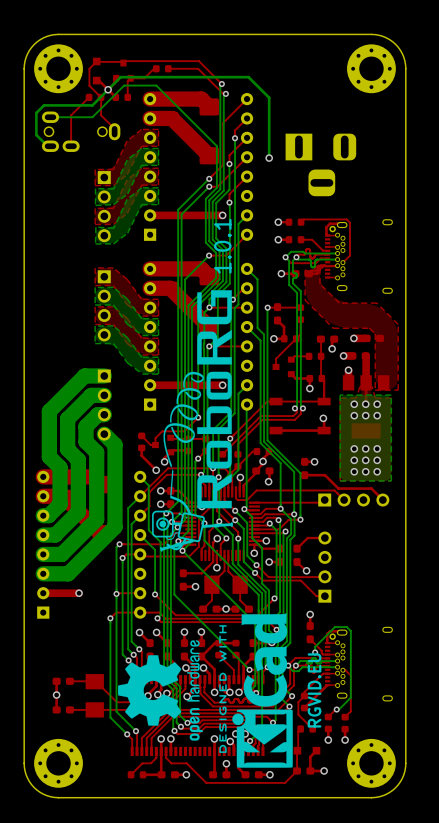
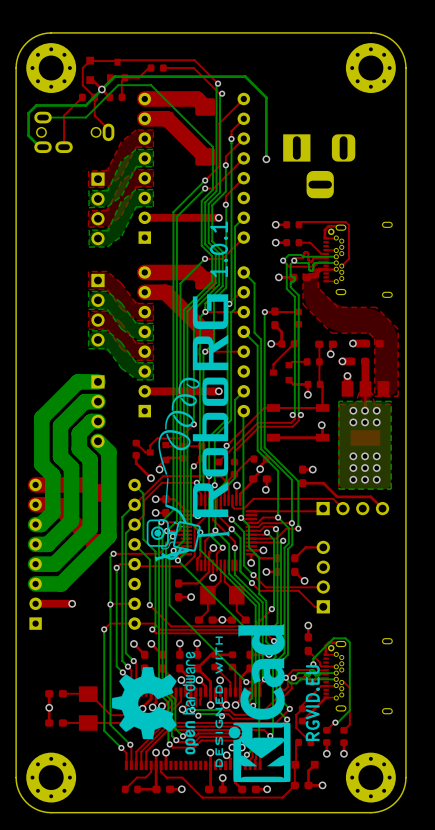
via: none -> (220, 680)
top track: (290, 674) (290, 683) (271, 702) (249, 702) (245, 698) (241, 702) (235, 698) (232, 702) (226, 699) (223, 702) (214, 702) (204, 692) -> (287, 687) (284, 690) (279, 689) (279, 695) (260, 714) (234, 714) (229, 710) (224, 710) (221, 707)
top track: (293, 676) (293, 685) (273, 706) (213, 706) (200, 693) -> (291, 688) (261, 718) (232, 718) (228, 714) (221, 716)
bottom track: none -> (221, 707) (219, 709) (192, 709)
via: none -> (192, 709)
bottom track: none -> (198, 715) (200, 714) (219, 714) (221, 716)
via: none -> (198, 715)
via: none -> (221, 716)

